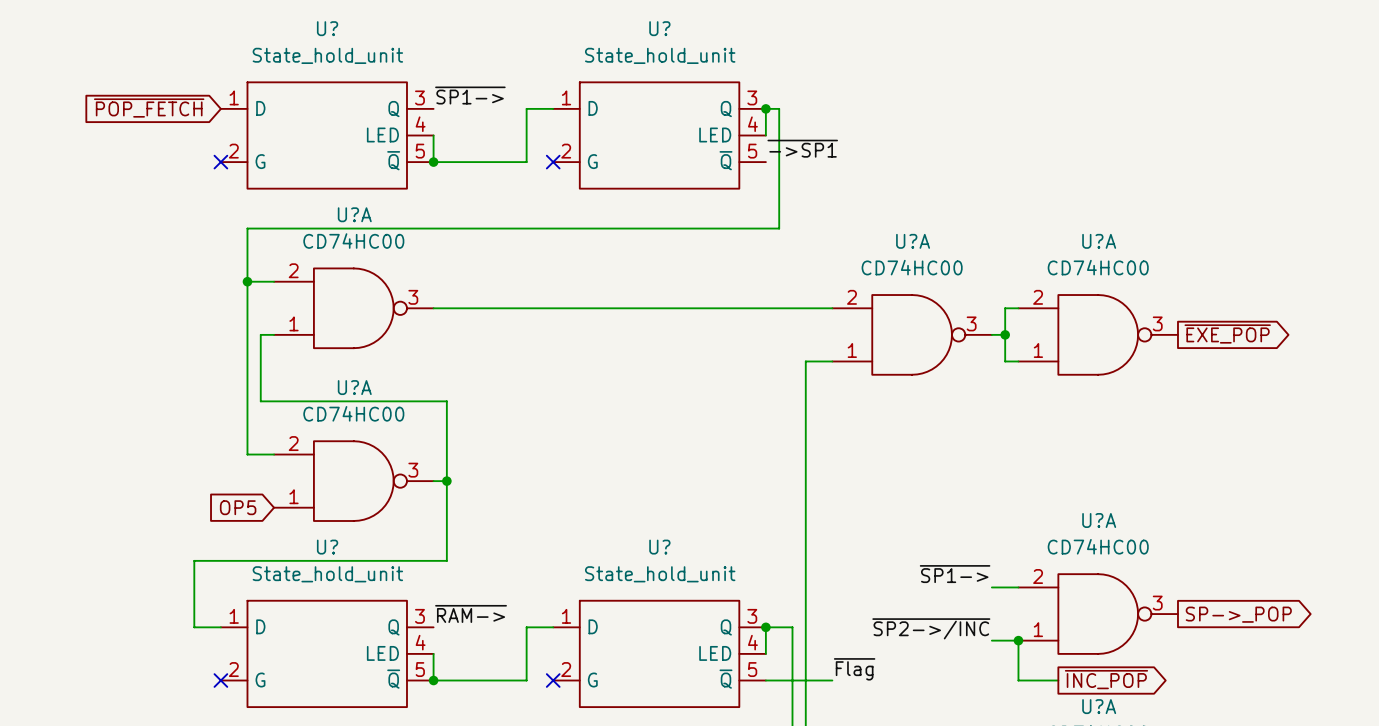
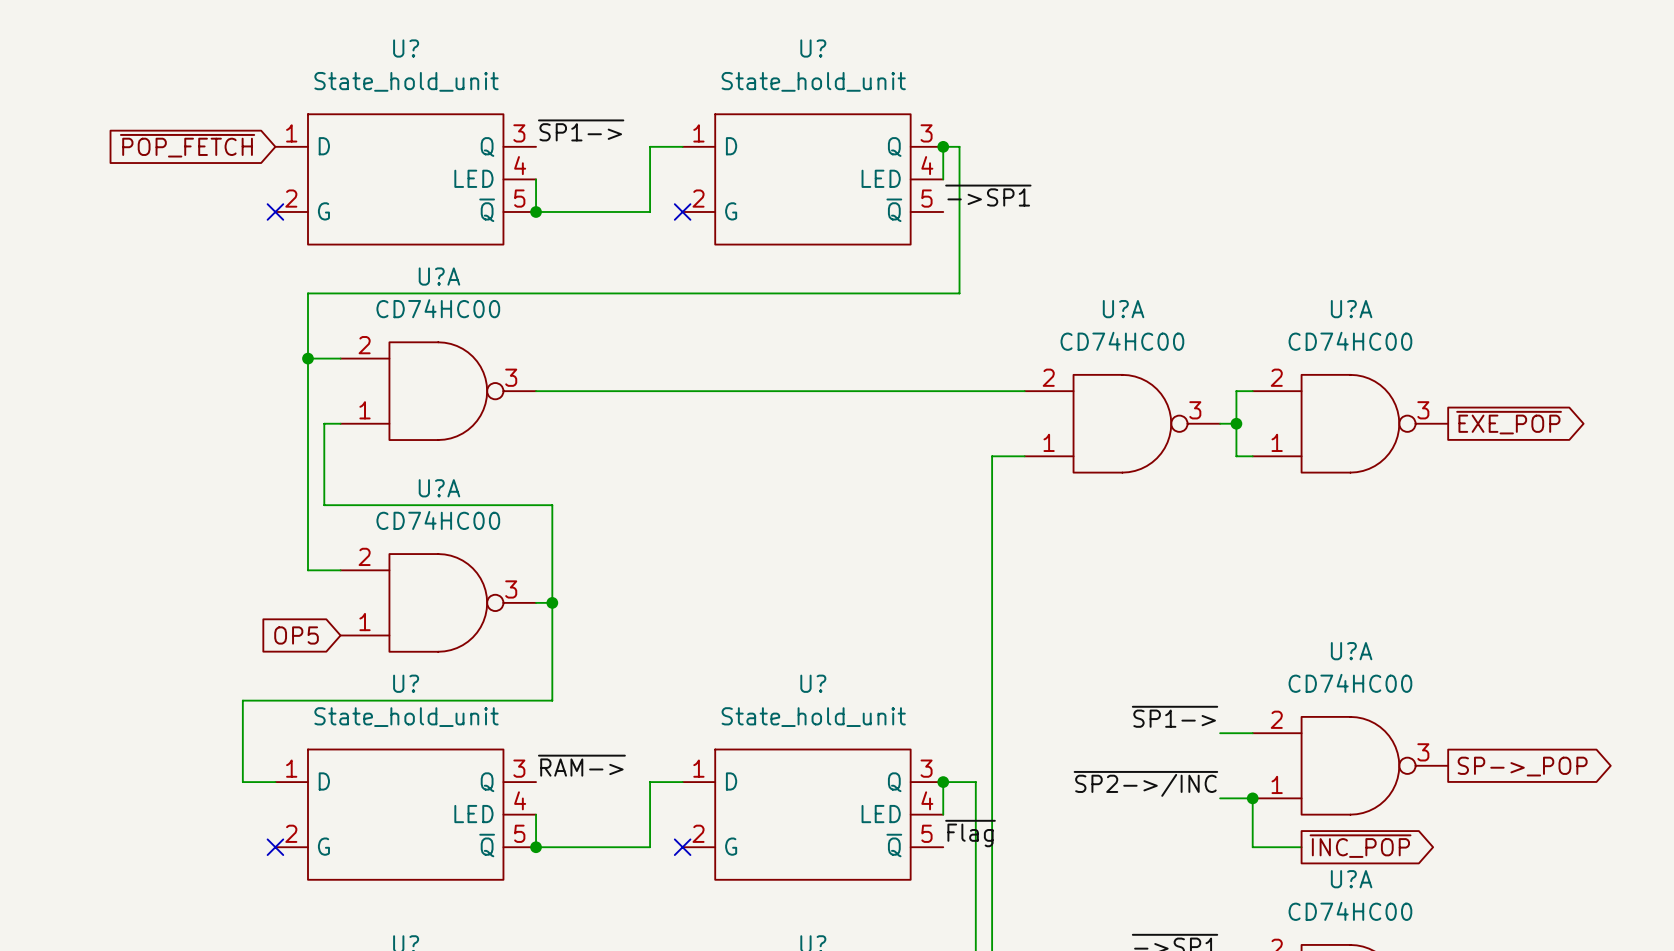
label position: ~{Flag} (854, 669) -> ~{Flag} (970, 833)
wire: (765, 680) (832, 680) -> none

